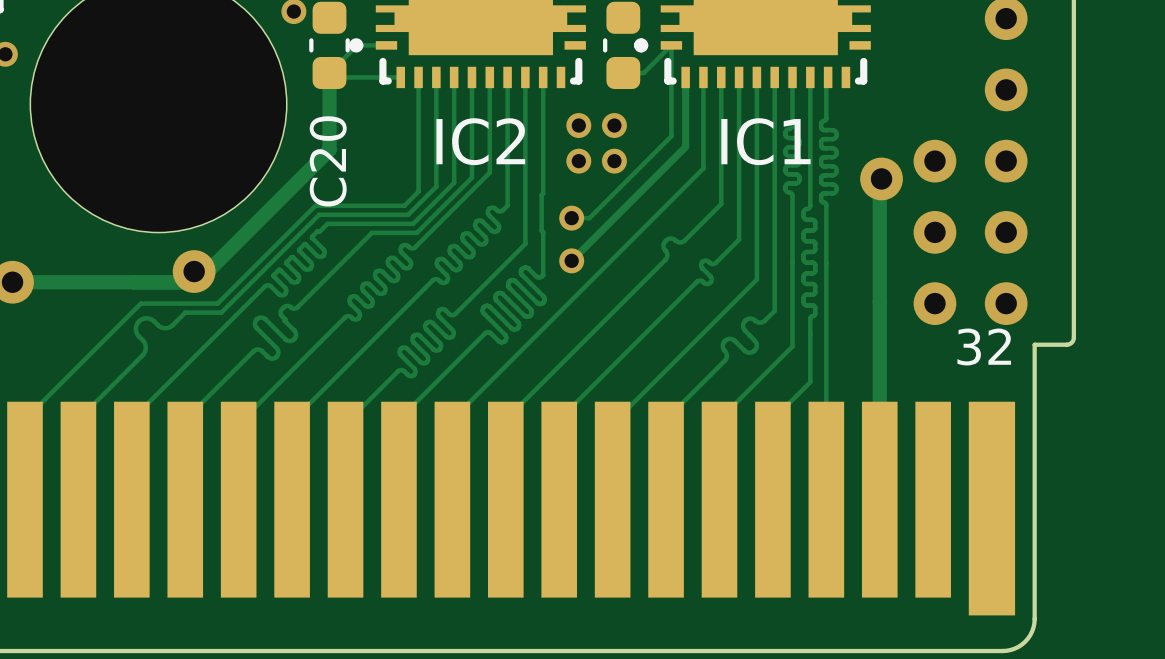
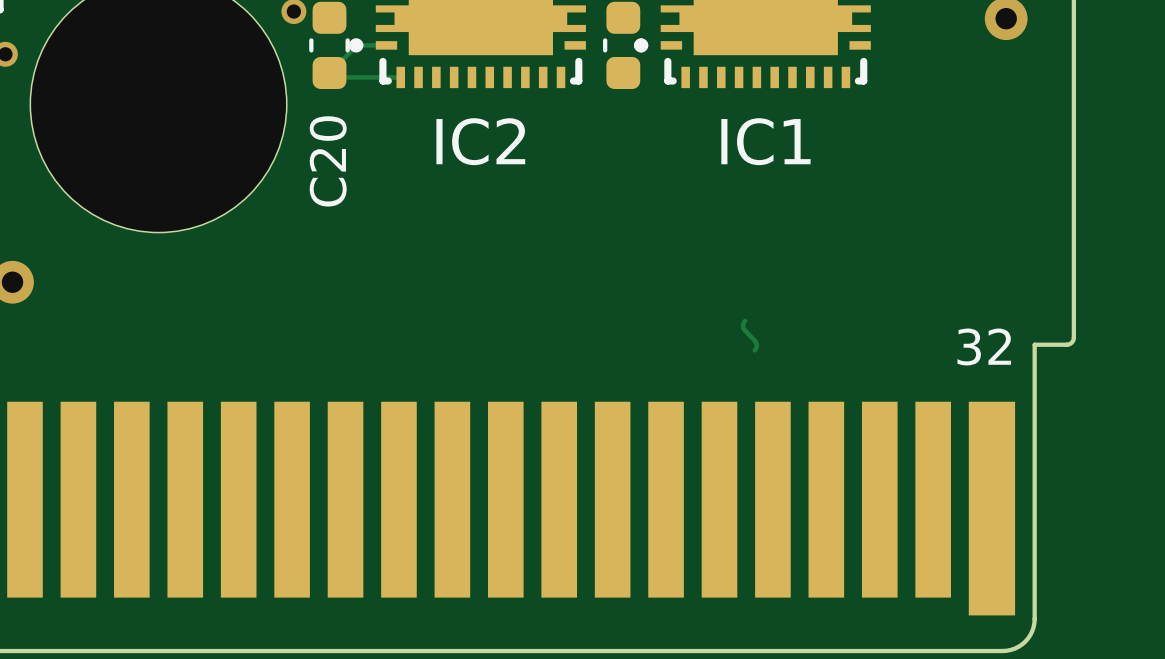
track: (329, 72) (329, 149) (197, 282) (12, 282) -> none
track: (623, 72) (643, 72) (671, 45) (671, 136) (589, 218) (571, 218) -> none
track: (418, 77) (418, 191) (404, 205) (315, 205) (217, 303) (140, 303) (24, 419) (24, 499) -> none
track: (436, 77) (436, 186) (408, 214) (319, 214) (221, 312) (185, 312) (171, 325) (166, 328) (159, 326) (148, 318) (139, 320) (135, 330) (145, 344) (144, 353) (78, 419) (78, 499) -> none
track: (454, 77) (454, 182) (413, 223) (327, 223) (319, 231) (317, 231) (311, 237) (324, 250) (323, 255) (317, 256) (304, 244) (299, 250) (311, 262) (310, 268) (305, 269) (291, 257) (286, 263) (298, 275) (297, 281) (292, 281) (278, 269) (273, 275) (285, 288) (285, 294) (280, 295) (270, 285) (265, 286) (131, 419) (131, 499) -> none
track: (471, 77) (471, 177) (416, 232) (371, 232) (297, 307) (284, 307) (280, 313) (295, 332) (295, 336) (293, 340) (285, 339) (264, 318) (256, 319) (255, 326) (277, 348) (278, 354) (274, 358) (270, 358) (260, 350) (254, 350) (185, 419) (185, 499) -> none
track: (489, 77) (489, 172) (415, 247) (411, 248) (405, 245) (401, 246) (401, 251) (410, 262) (409, 267) (404, 267) (393, 258) (389, 259) (388, 264) (398, 275) (396, 279) (391, 280) (381, 270) (376, 271) (375, 277) (385, 287) (384, 292) (378, 293) (368, 283) (363, 284) (362, 290) (372, 300) (371, 305) (366, 306) (356, 296) (351, 297) (349, 302) (359, 312) (358, 317) (355, 319) (349, 316) (345, 317) (238, 423) (238, 499) -> none
track: (507, 77) (507, 205) (501, 211) (491, 207) (487, 212) (498, 225) (498, 229) (492, 231) (481, 221) (476, 221) (475, 227) (486, 238) (485, 243) (480, 244) (469, 233) (463, 234) (462, 240) (473, 251) (472, 256) (467, 257) (456, 246) (450, 247) (450, 252) (460, 263) (459, 268) (454, 269) (443, 259) (438, 260) (437, 265) (447, 276) (446, 281) (442, 282) (436, 279) (432, 280) (292, 421) (292, 499) -> none
track: (525, 77) (525, 243) (455, 314) (450, 314) (443, 309) (439, 310) (438, 315) (453, 330) (452, 336) (447, 337) (432, 322) (426, 322) (425, 328) (440, 343) (440, 348) (434, 349) (419, 335) (414, 335) (412, 341) (427, 356) (427, 361) (421, 362) (406, 348) (401, 348) (400, 354) (414, 369) (414, 374) (409, 376) (403, 370) (398, 371) (345, 423) (345, 499) -> none
track: (543, 77) (543, 193) (541, 195) (543, 275) (536, 276) (525, 267) (520, 271) (544, 297) (544, 301) (537, 303) (515, 280) (510, 280) (508, 287) (531, 309) (531, 314) (525, 316) (502, 293) (497, 293) (495, 299) (518, 322) (518, 327) (512, 329) (489, 306) (484, 306) (483, 312) (505, 335) (505, 340) (499, 341) (490, 332) (485, 332) (398, 419) (398, 499) -> none
track: (685, 77) (685, 146) (571, 260) -> none
track: (703, 77) (703, 168) (452, 419) (452, 499) -> none
track: (721, 77) (721, 204) (683, 241) (678, 242) (670, 238) (665, 241) (663, 245) (667, 254) (665, 259) (505, 419) (505, 499) -> none
track: (739, 77) (739, 239) (715, 263) (705, 260) (701, 262) (701, 267) (711, 277) (710, 282) (706, 283) (700, 280) (696, 281) (559, 419) (559, 499) -> none
track: (756, 77) (756, 279) (612, 423) (612, 499) -> none
track: (774, 77) (774, 310) (761, 322) (751, 318) (745, 320) -> none
track: (792, 77) (792, 125) (785, 132) (787, 137) (796, 138) (799, 141) (797, 146) (788, 147) (785, 150) (787, 155) (796, 156) (799, 159) (797, 164) (788, 165) (785, 168) (787, 173) (796, 174) (799, 177) (797, 182) (788, 183) (785, 186) (786, 191) (792, 195) (792, 346) (719, 419) (719, 499) -> none
track: (810, 77) (810, 205) (803, 212) (804, 218) (810, 219) -> none
track: (828, 77) (826, 79) (826, 118) (821, 122) (821, 127) (823, 129) (834, 130) (836, 135) (833, 138) (822, 139) (821, 145) (823, 148) (834, 148) (836, 153) (833, 157) (822, 157) (821, 164) (823, 166) (834, 166) (836, 171) (833, 175) (822, 175) (821, 182) (823, 184) (834, 184) (836, 188) (834, 193) (823, 193) (821, 196) (821, 201) (826, 205) (826, 499) -> none
via: (1006, 89) -> none
via: (578, 125) -> none
via: (614, 125) -> none
via: (578, 161) -> none
via: (614, 161) -> none
via: (934, 161) -> none
via: (1006, 161) -> none
track: (881, 178) (879, 180) (879, 499) -> none
via: (881, 178) -> none
via: (571, 218) -> none
track: (810, 219) (815, 221) (815, 229) (805, 230) (803, 233) (804, 240) (813, 241) (815, 243) (814, 251) (805, 252) (803, 255) (804, 261) (813, 262) (815, 265) (814, 272) (805, 273) (803, 276) (804, 283) (813, 284) (815, 286) (814, 293) (805, 294) (803, 298) (804, 304) (813, 305) (815, 307) (815, 314) (810, 318) (810, 382) (772, 419) (772, 499) -> none
via: (934, 232) -> none
via: (1006, 232) -> none
via: (571, 260) -> none
via: (194, 271) -> none
via: (934, 303) -> none
via: (1006, 303) -> none
track: (725, 340) (731, 339) (746, 351) (754, 350) -> none
track: (724, 341) (722, 346) (726, 354) (725, 360) (666, 419) (666, 499) -> none

